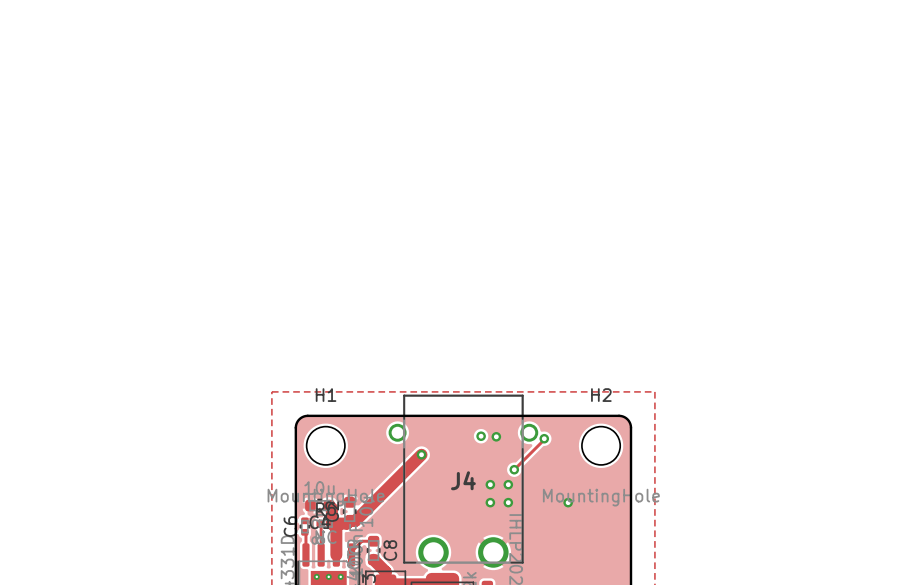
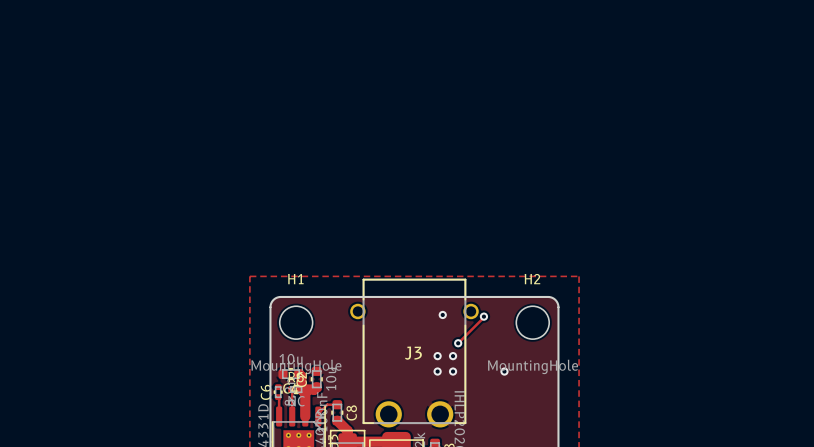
via: (481, 436) -> none
track: (421, 454) (355, 520) (349, 520) -> none
via: (421, 454) -> none
J4 name: J4 (463, 480) -> J3 (413, 353)

